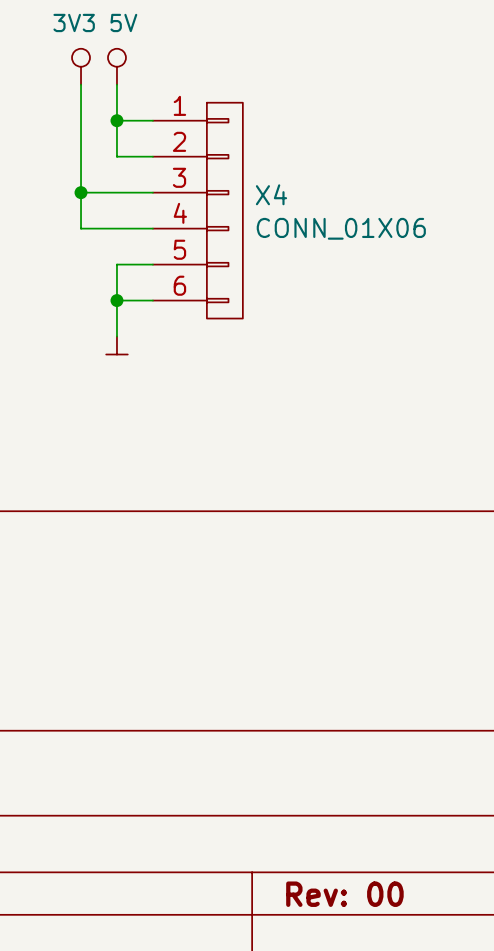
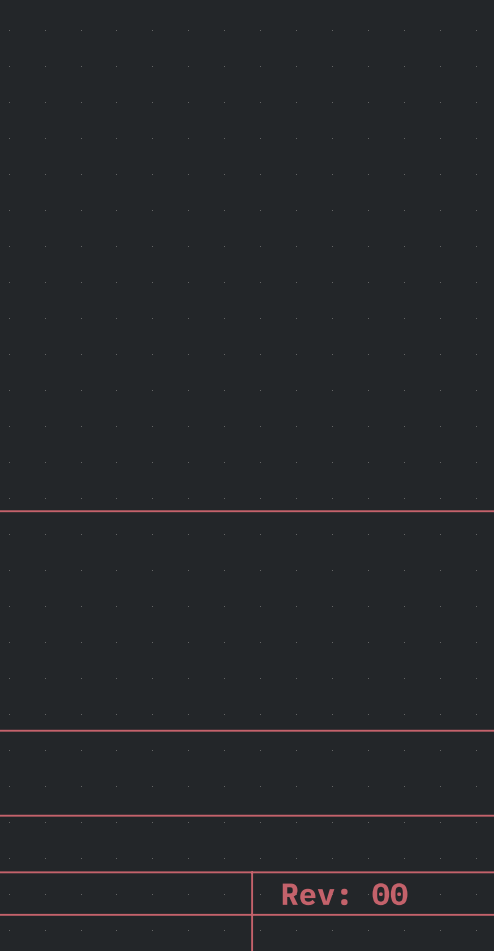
power symbol: 3V3 (81, 66) -> none
power symbol: 5V (116, 66) -> none
wire: (81, 84) (81, 228) (152, 228) -> none
wire: (116, 84) (116, 156) (152, 156) -> none
wire: (116, 120) (152, 120) -> none
junction: (116, 120) -> none
wire: (81, 192) (152, 192) -> none
junction: (81, 192) -> none
X4: CONN_01X06 (197, 210) -> none
wire: (152, 264) (116, 264) (116, 336) -> none
wire: (116, 300) (152, 300) -> none
junction: (116, 300) -> none
power symbol: (116, 345) -> none

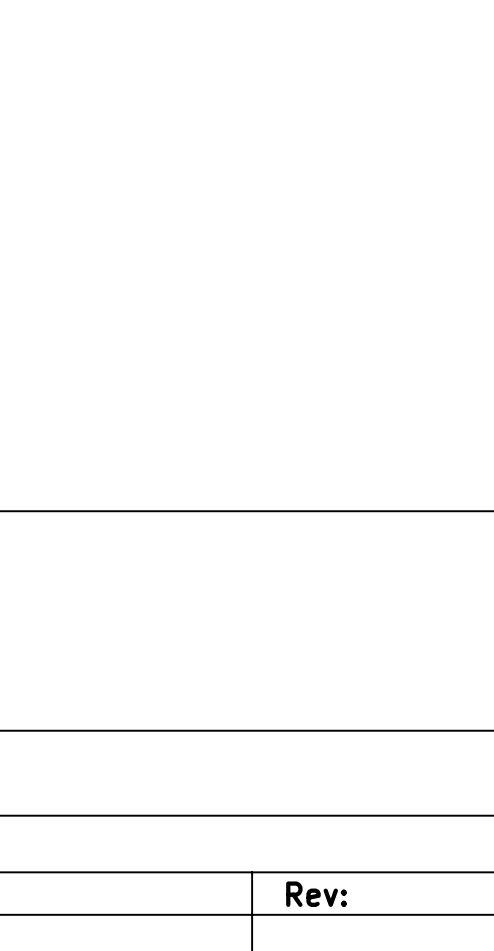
title block: Rev: 00 (345, 894) -> Rev: (316, 894)

